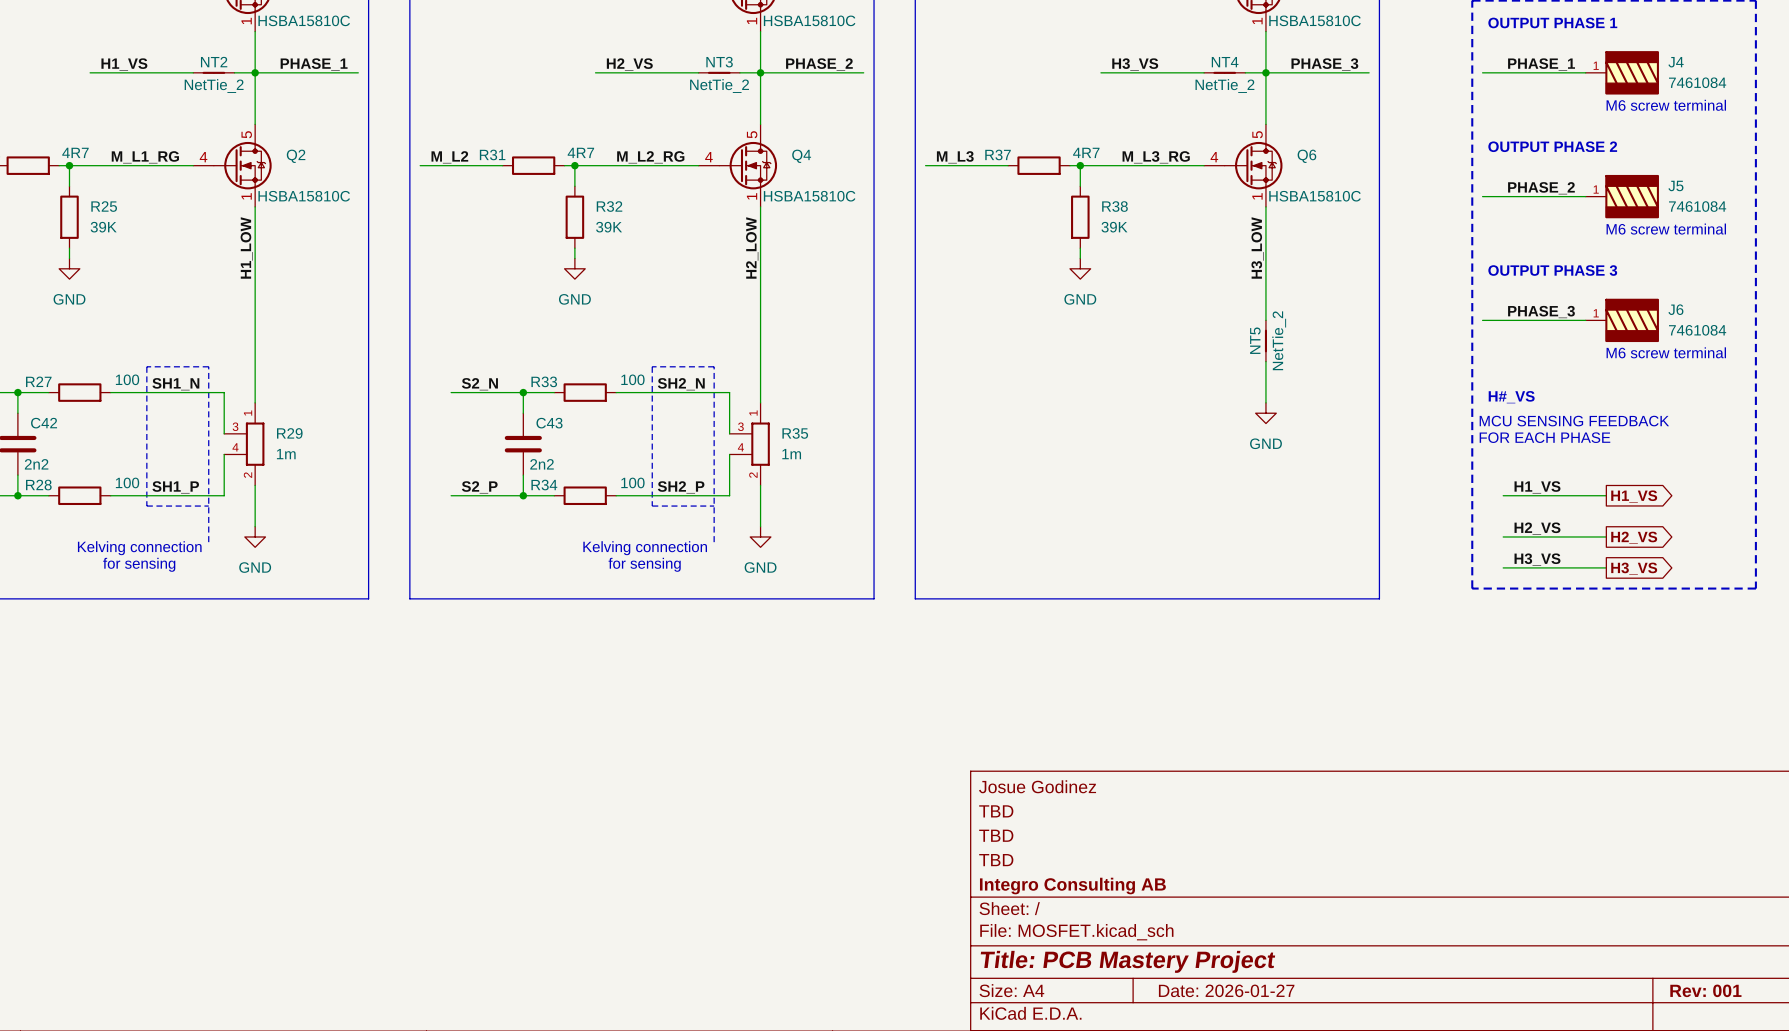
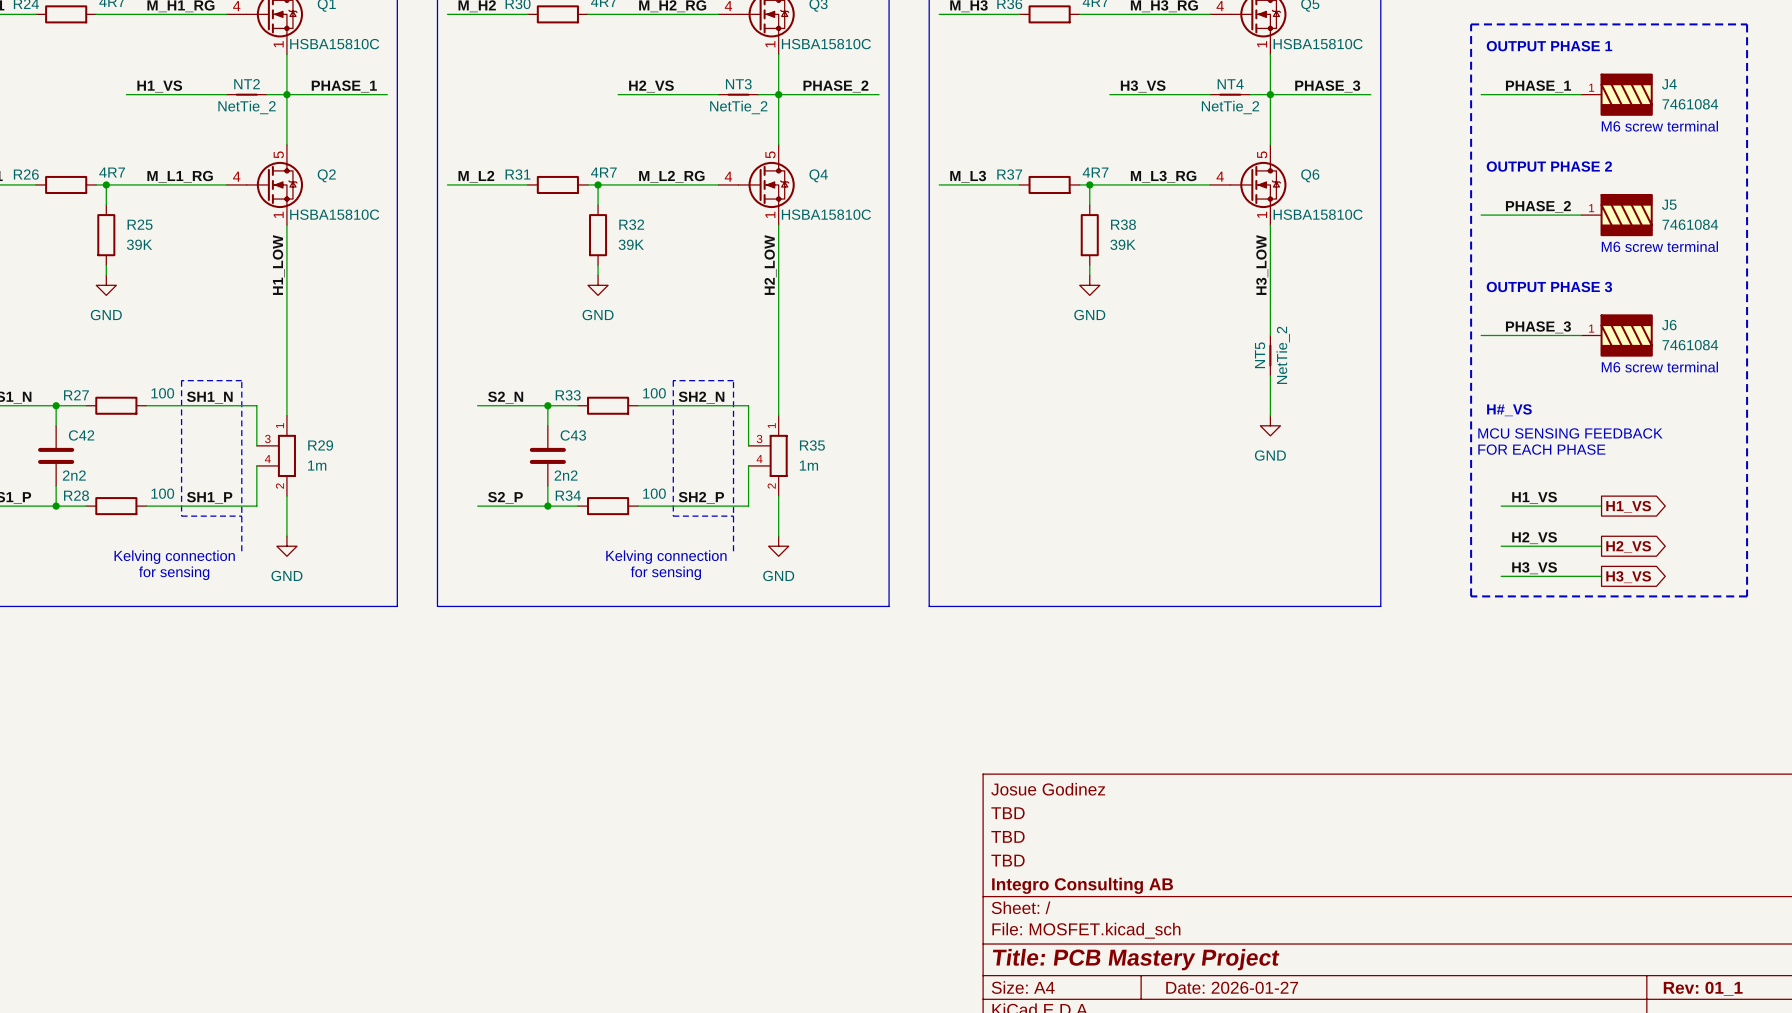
title block: Rev: 001 (1705, 990) -> Rev: 01_1 (1703, 988)

